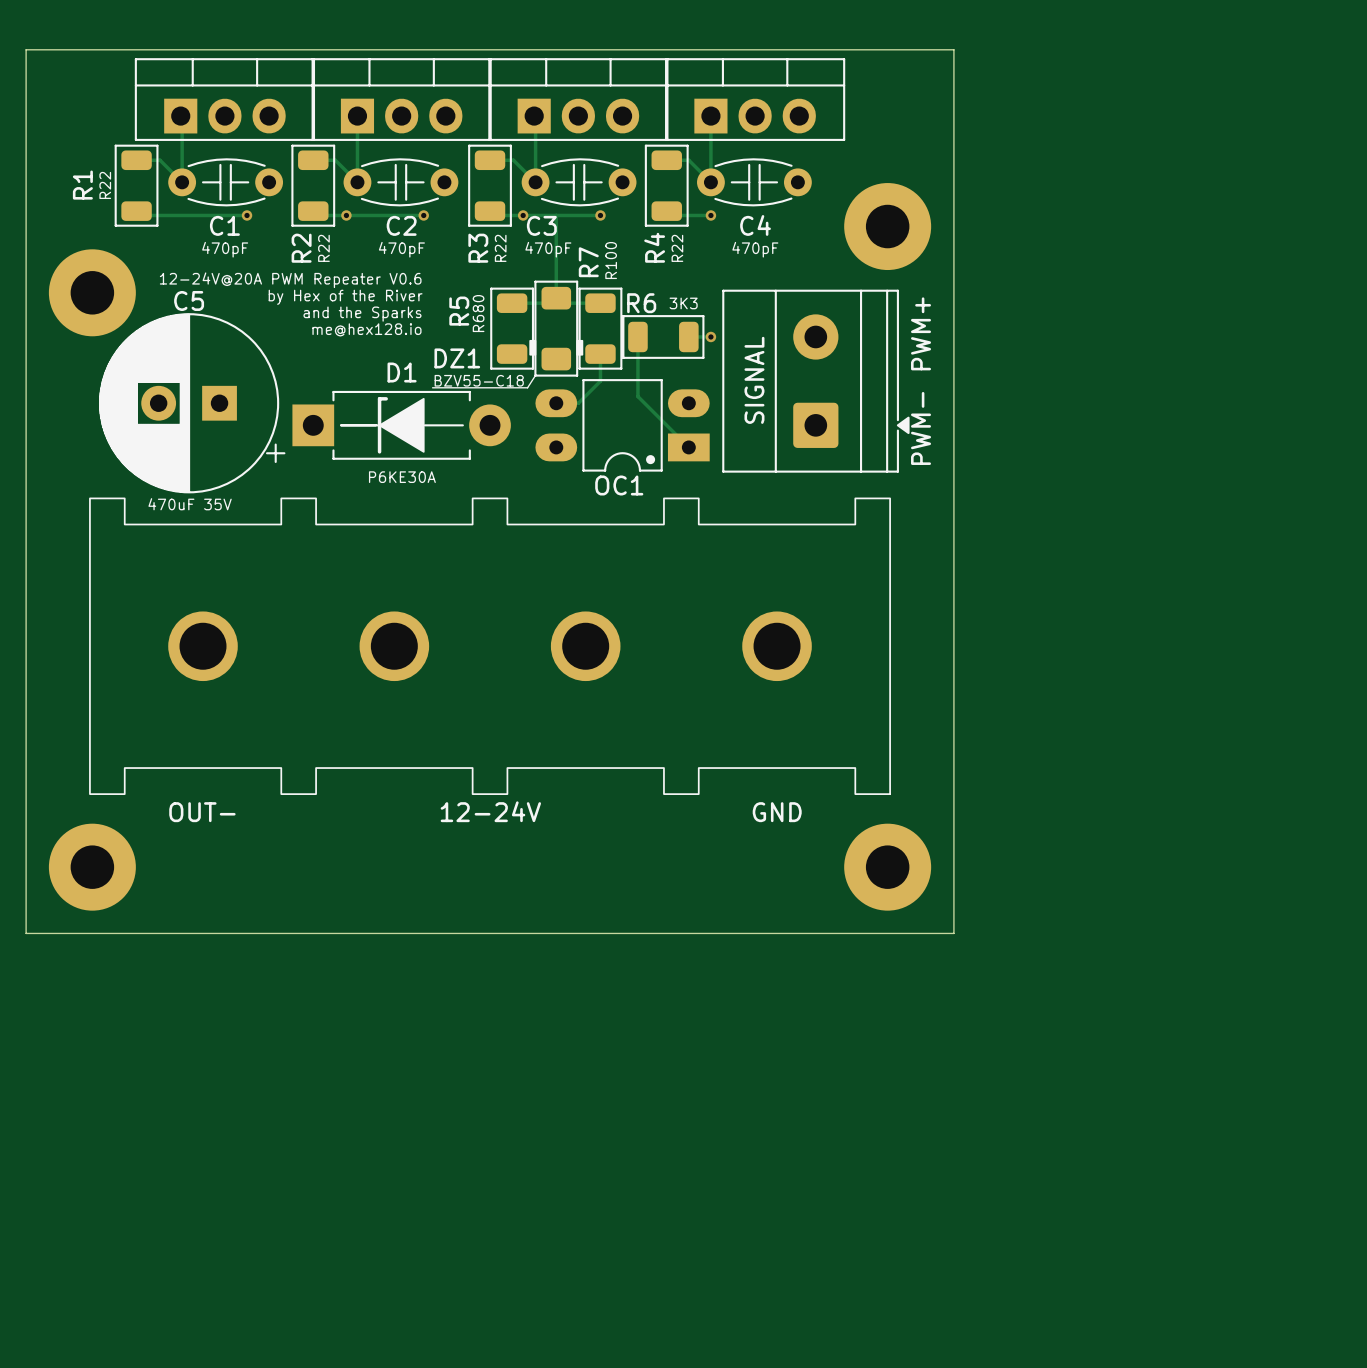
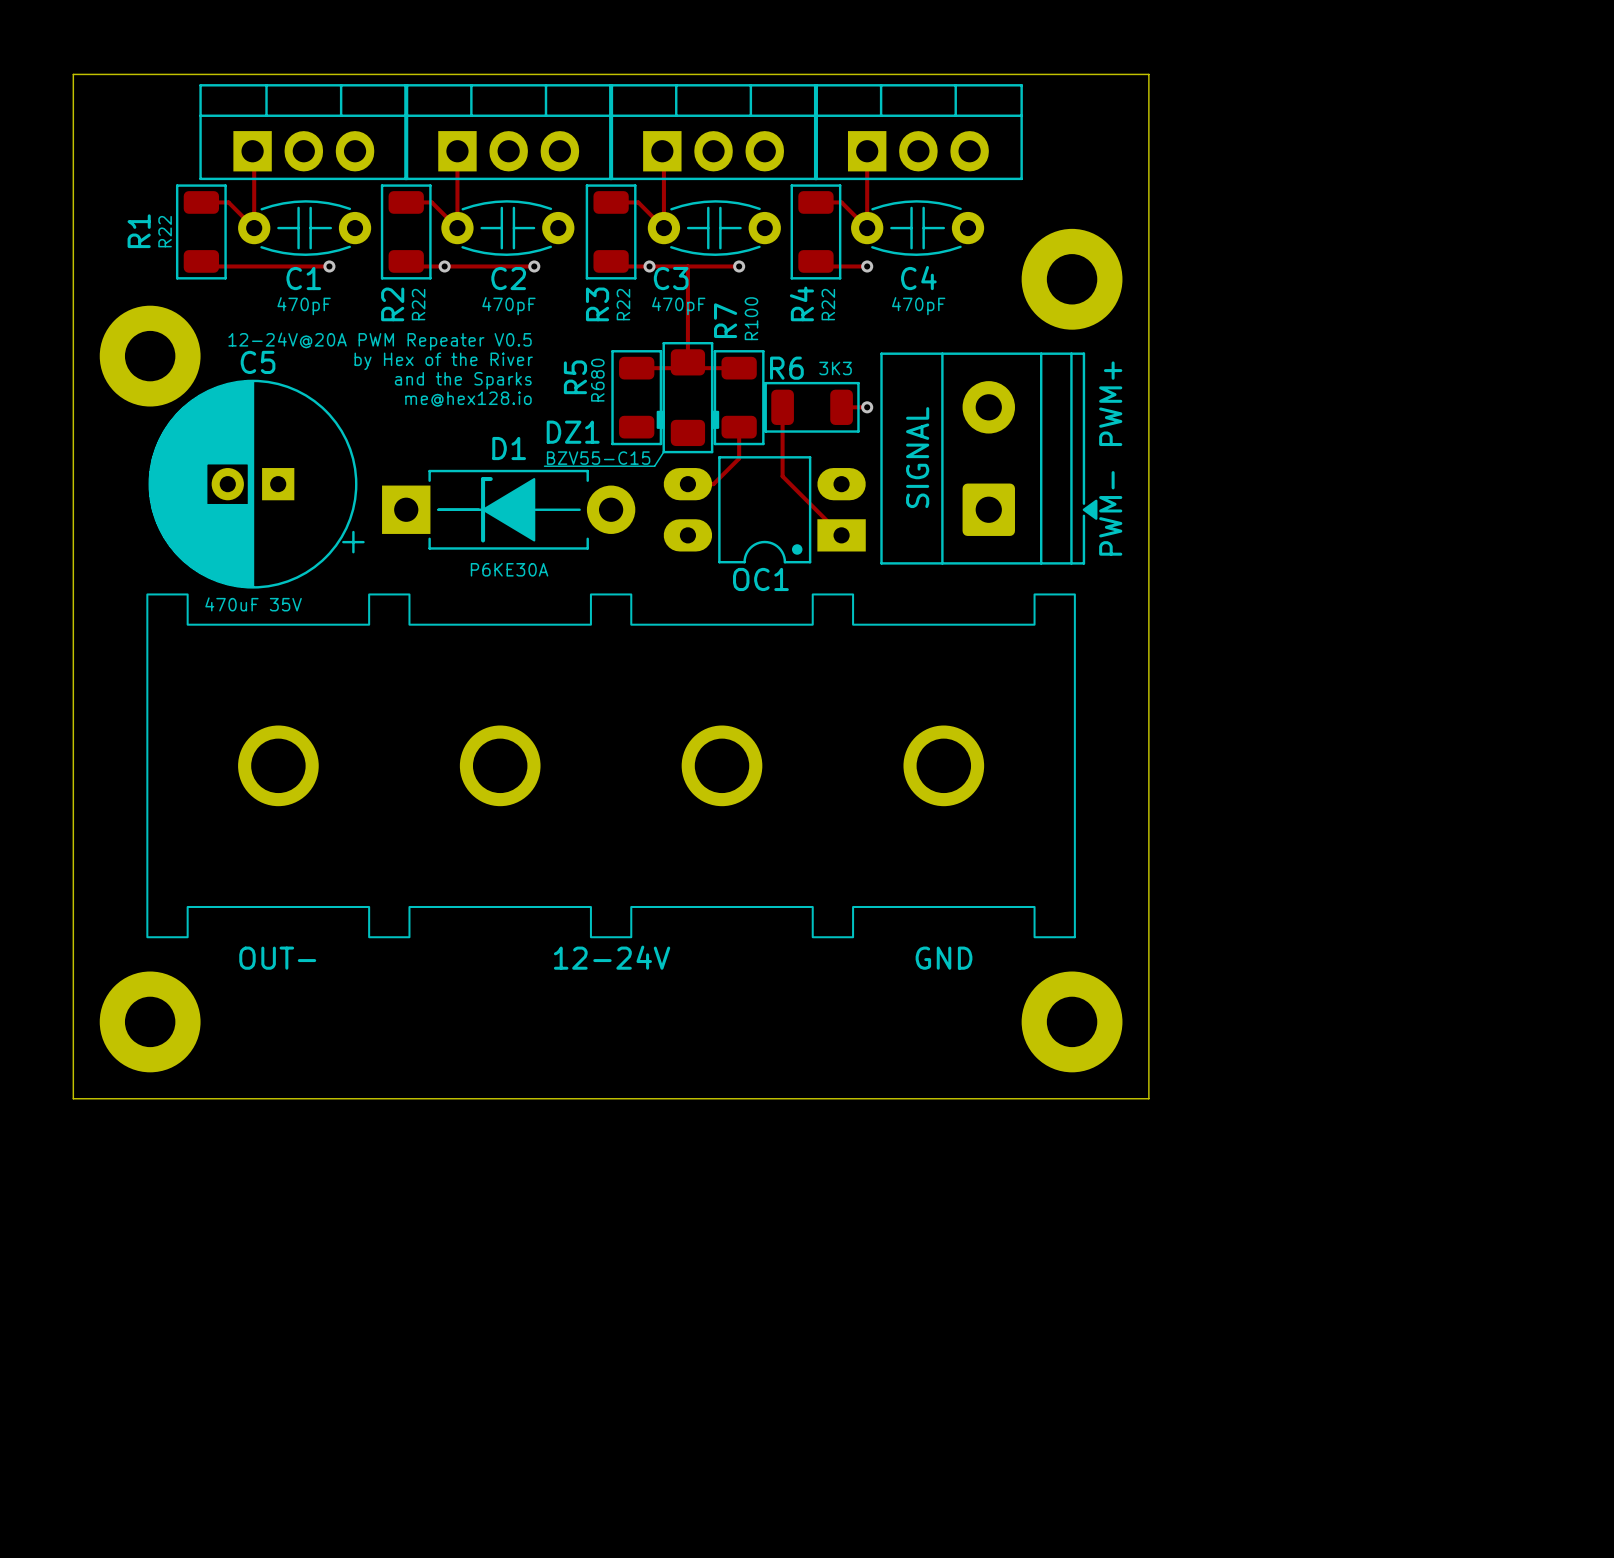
text: 12-24V@20A PWM Repeater V0.6 (290, 280) -> 12-24V@20A PWM Repeater V0.5 (380, 341)
C5 footprint: [98, 313, 286, 494] -> [148, 379, 365, 589]
DZ1 value: BZV55-C18 (479, 380) -> BZV55-C15 (598, 458)

